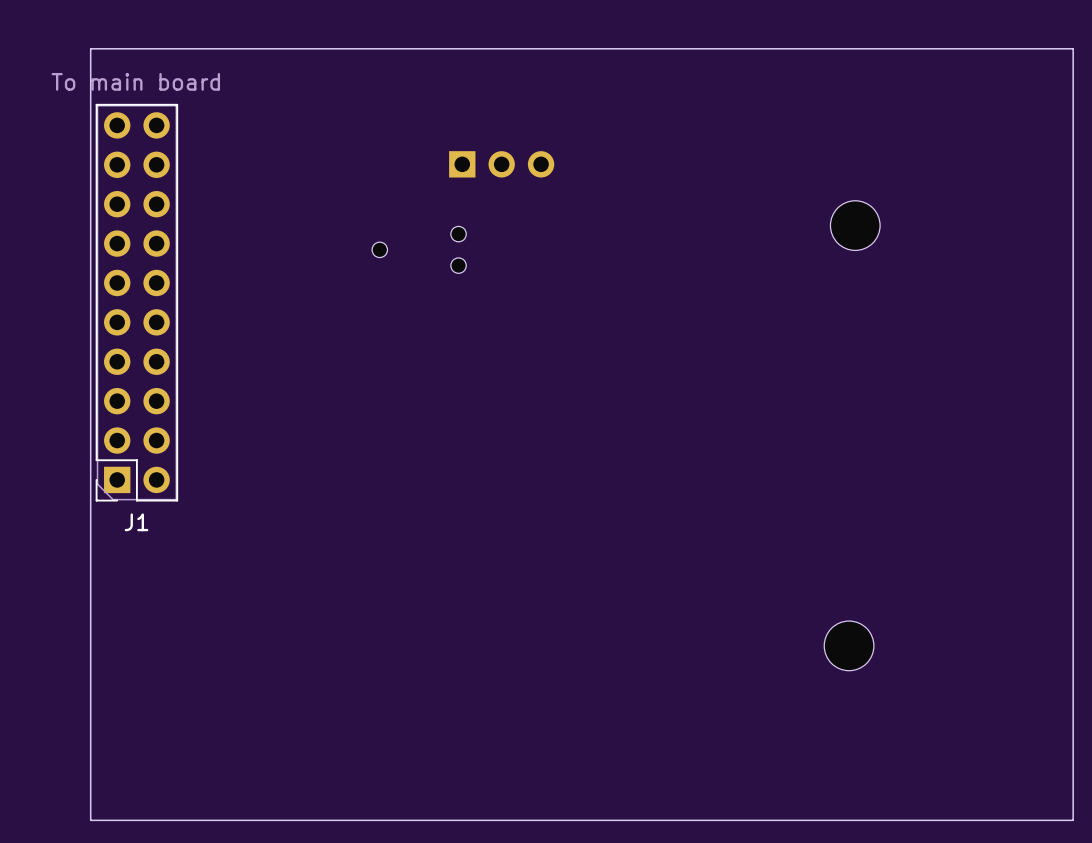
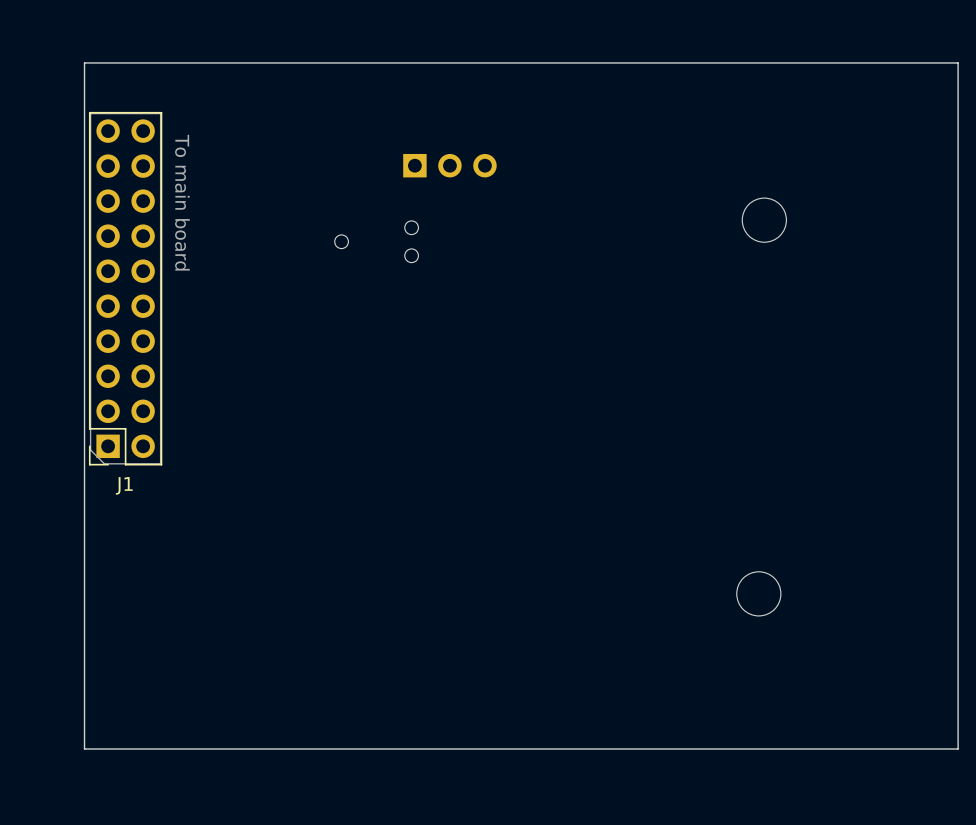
J1 value rotation: 0° (135, 81) -> 90° clockwise (182, 202)

